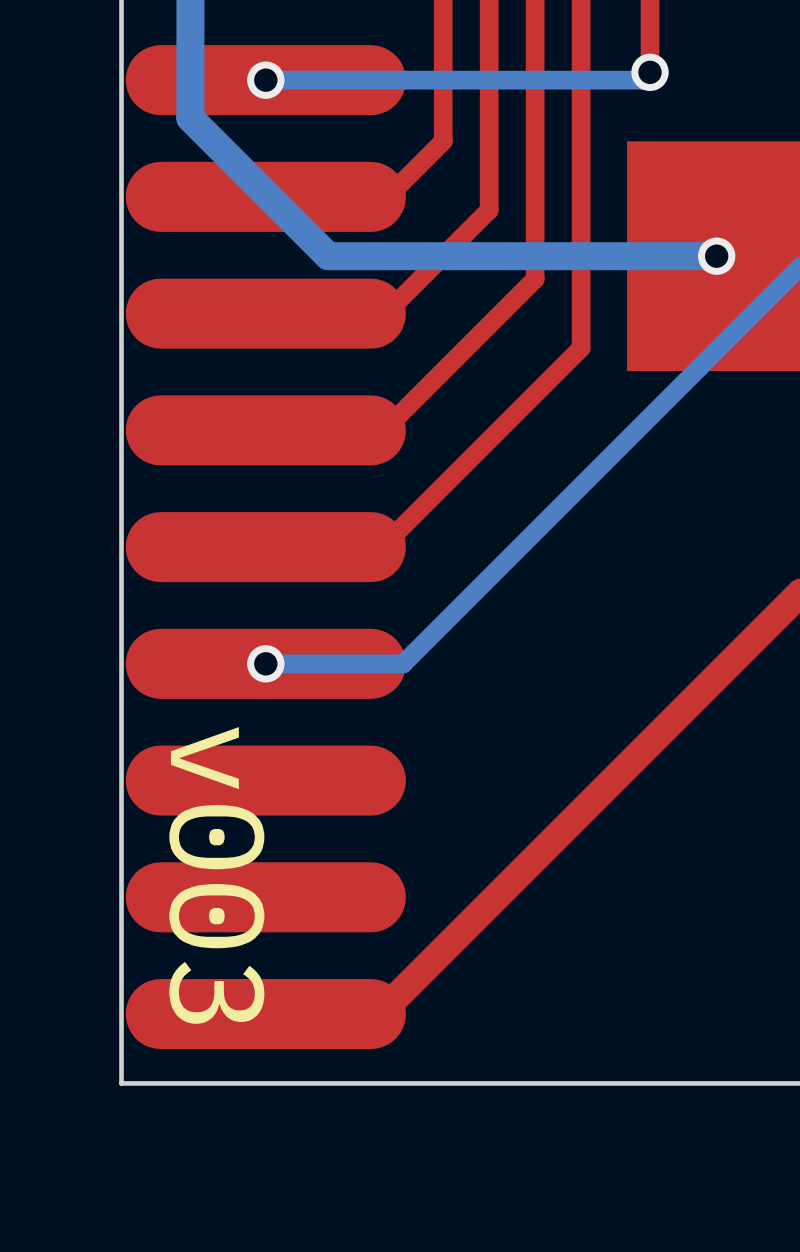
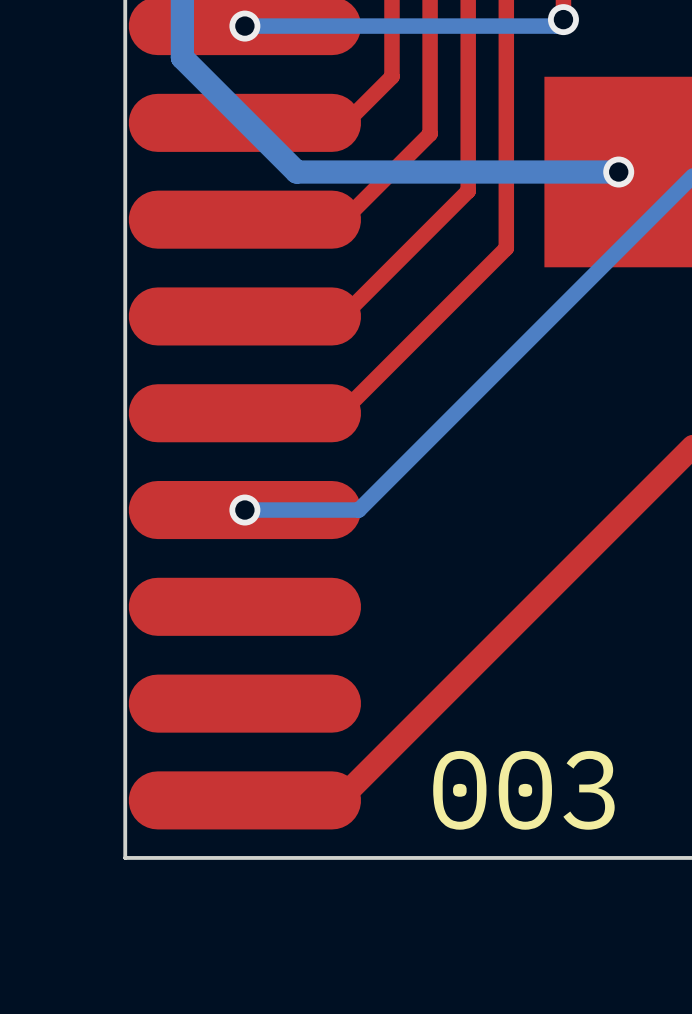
text: v003 (216, 875) -> none
text: none -> 003 (523, 790)

